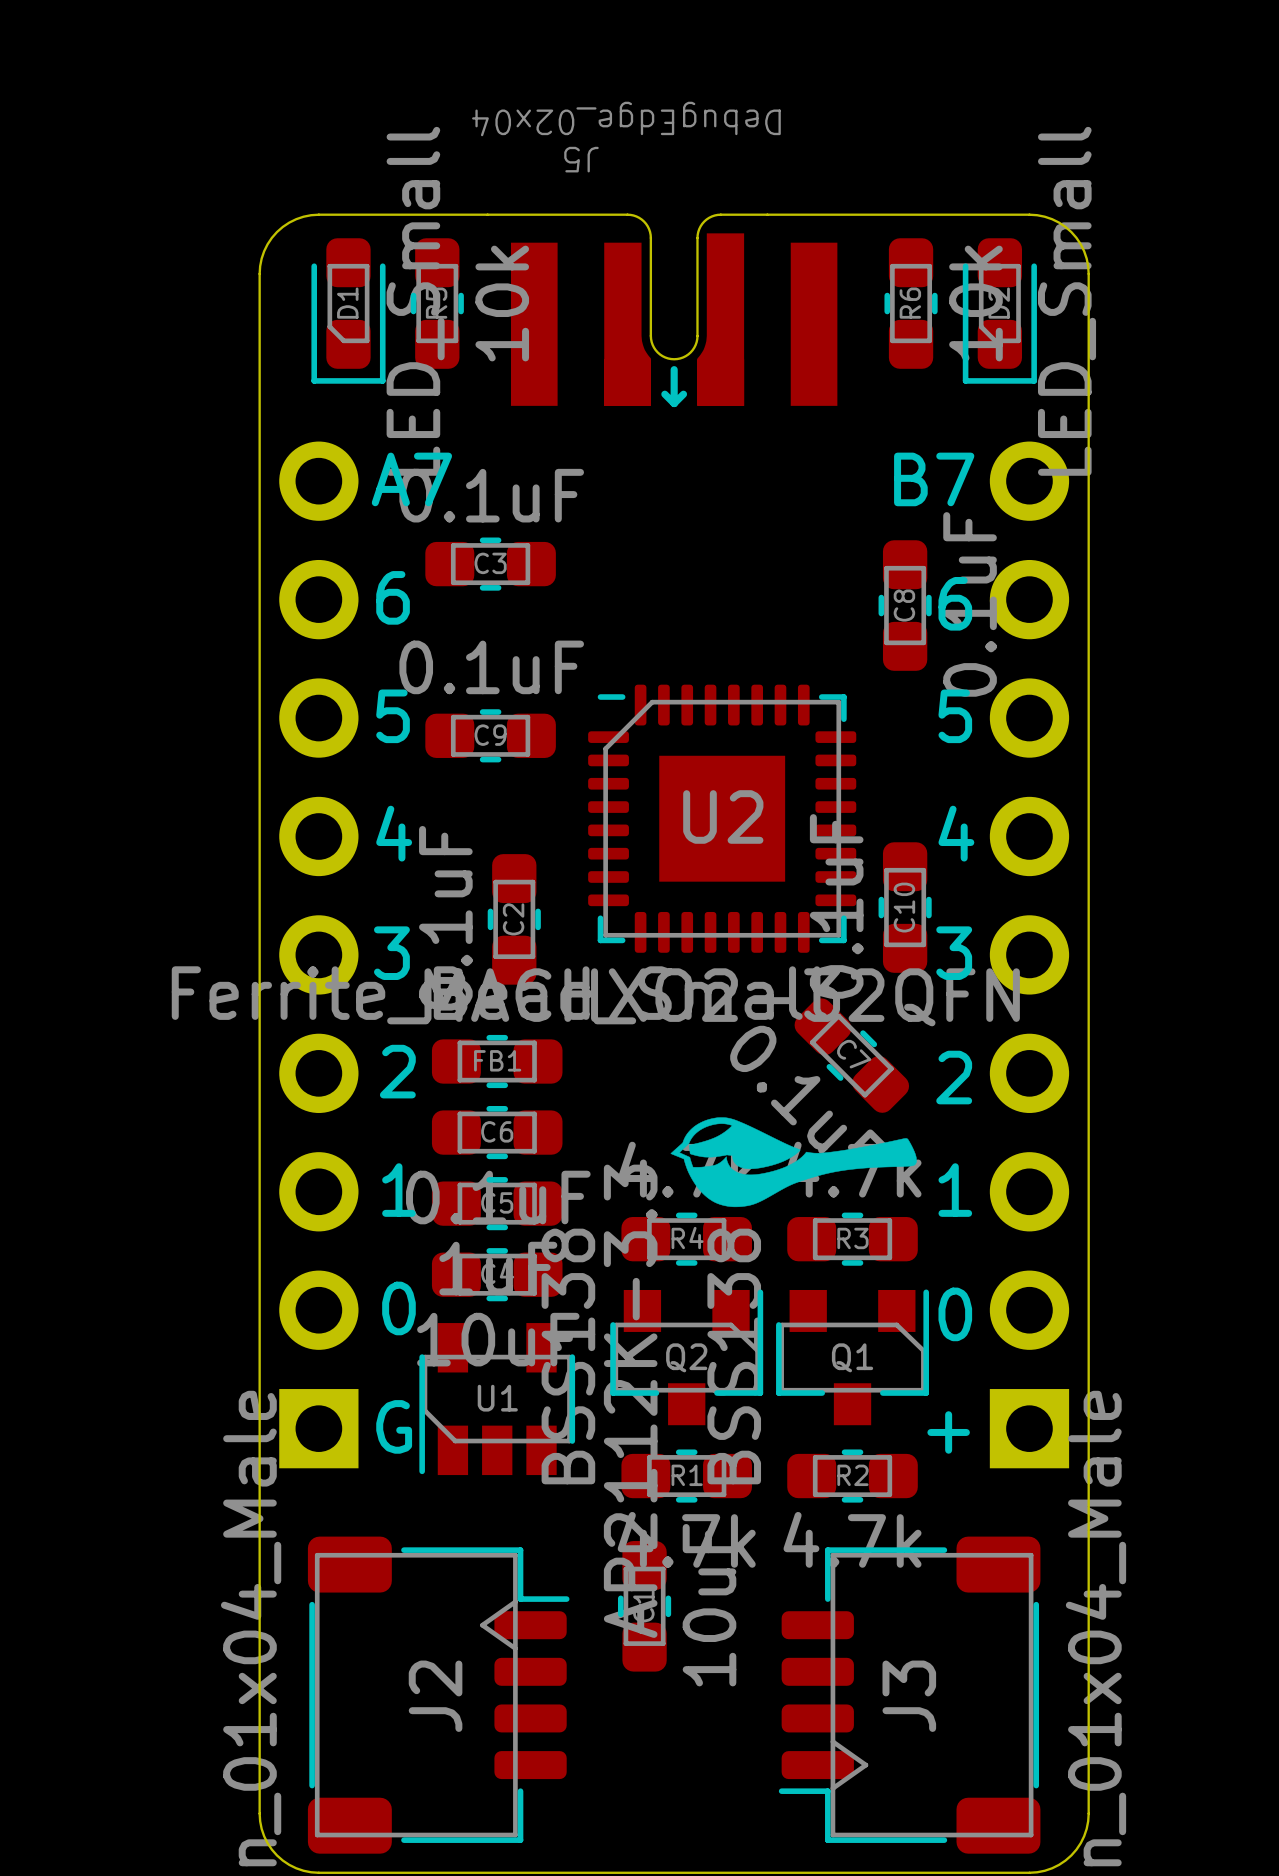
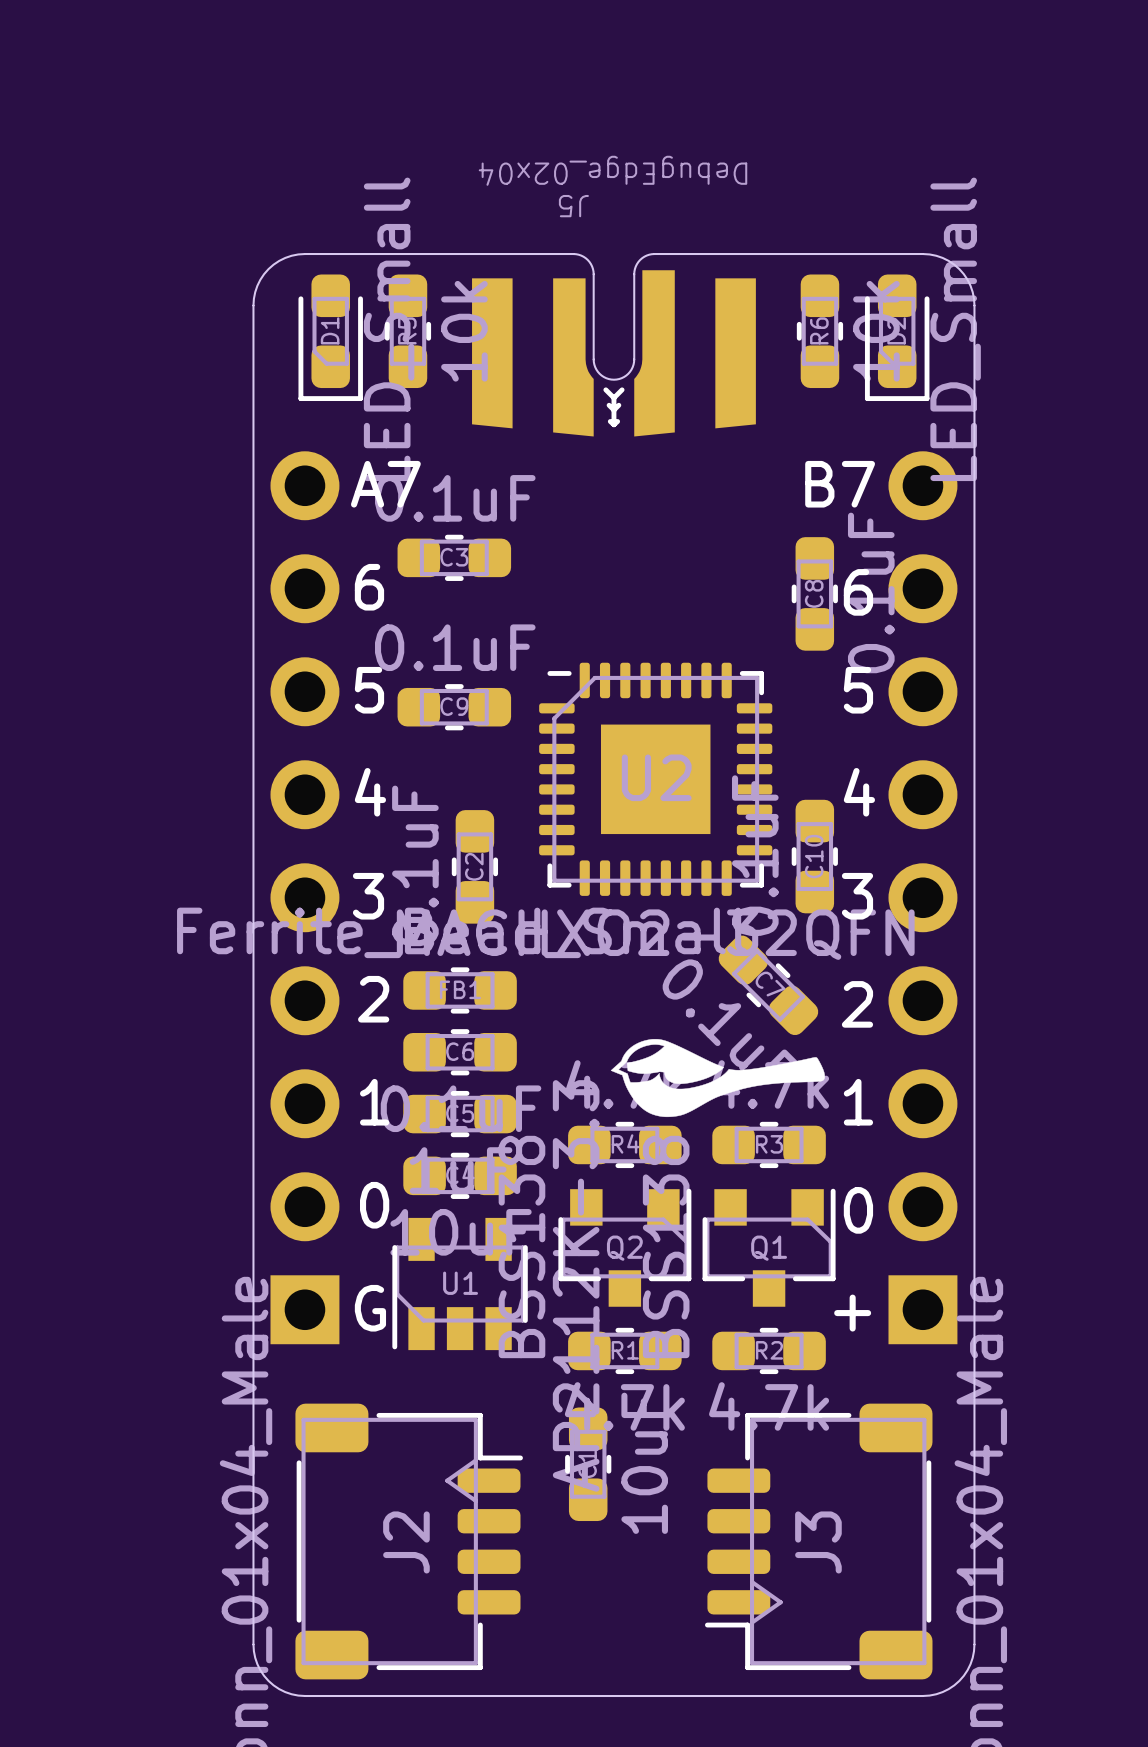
J5 value position: DebugEdge_02x04 (626, 118) -> DebugEdge_02x04 (612, 170)
J5 name position: J5 (581, 159) -> J5 (573, 206)
J5 footprint: [486, 213, 838, 408] -> [450, 253, 756, 437]

